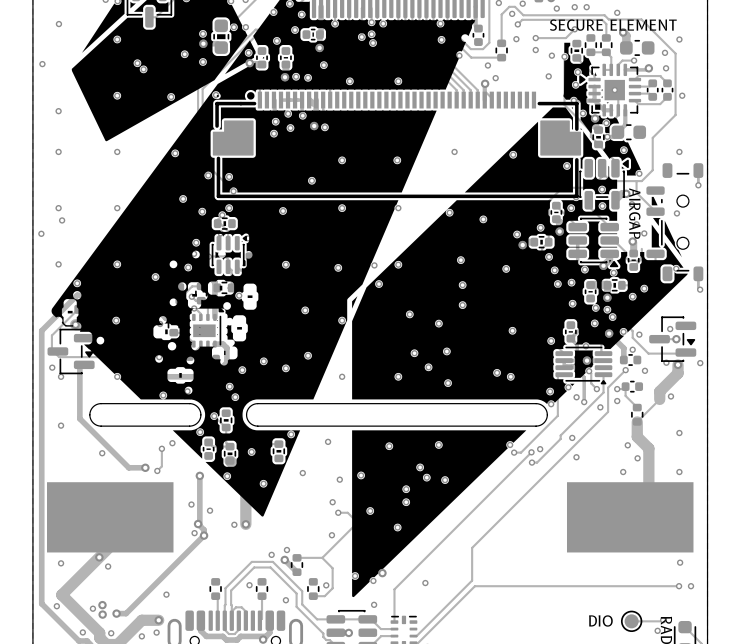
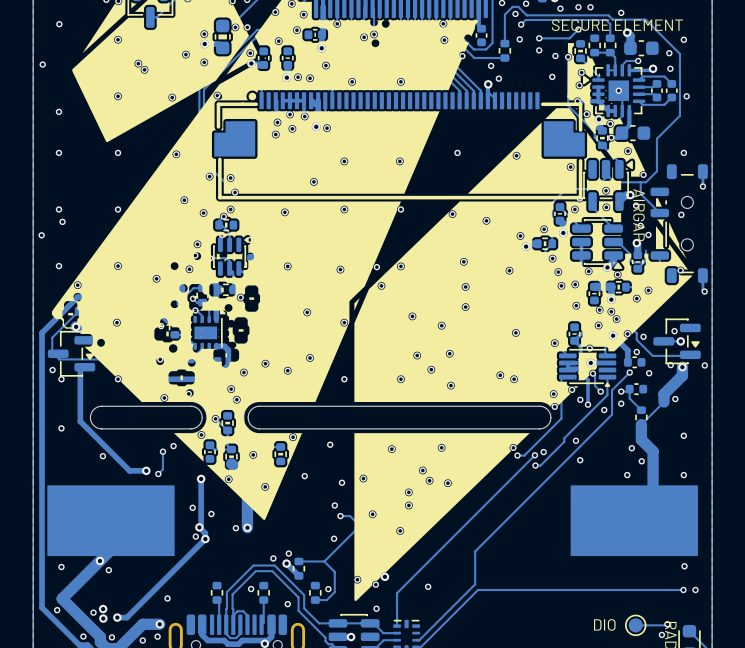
track: none -> (374, 22) (373, 29)
via: (371, 22) -> none
via: (383, 23) -> none
via: (373, 43) -> none

